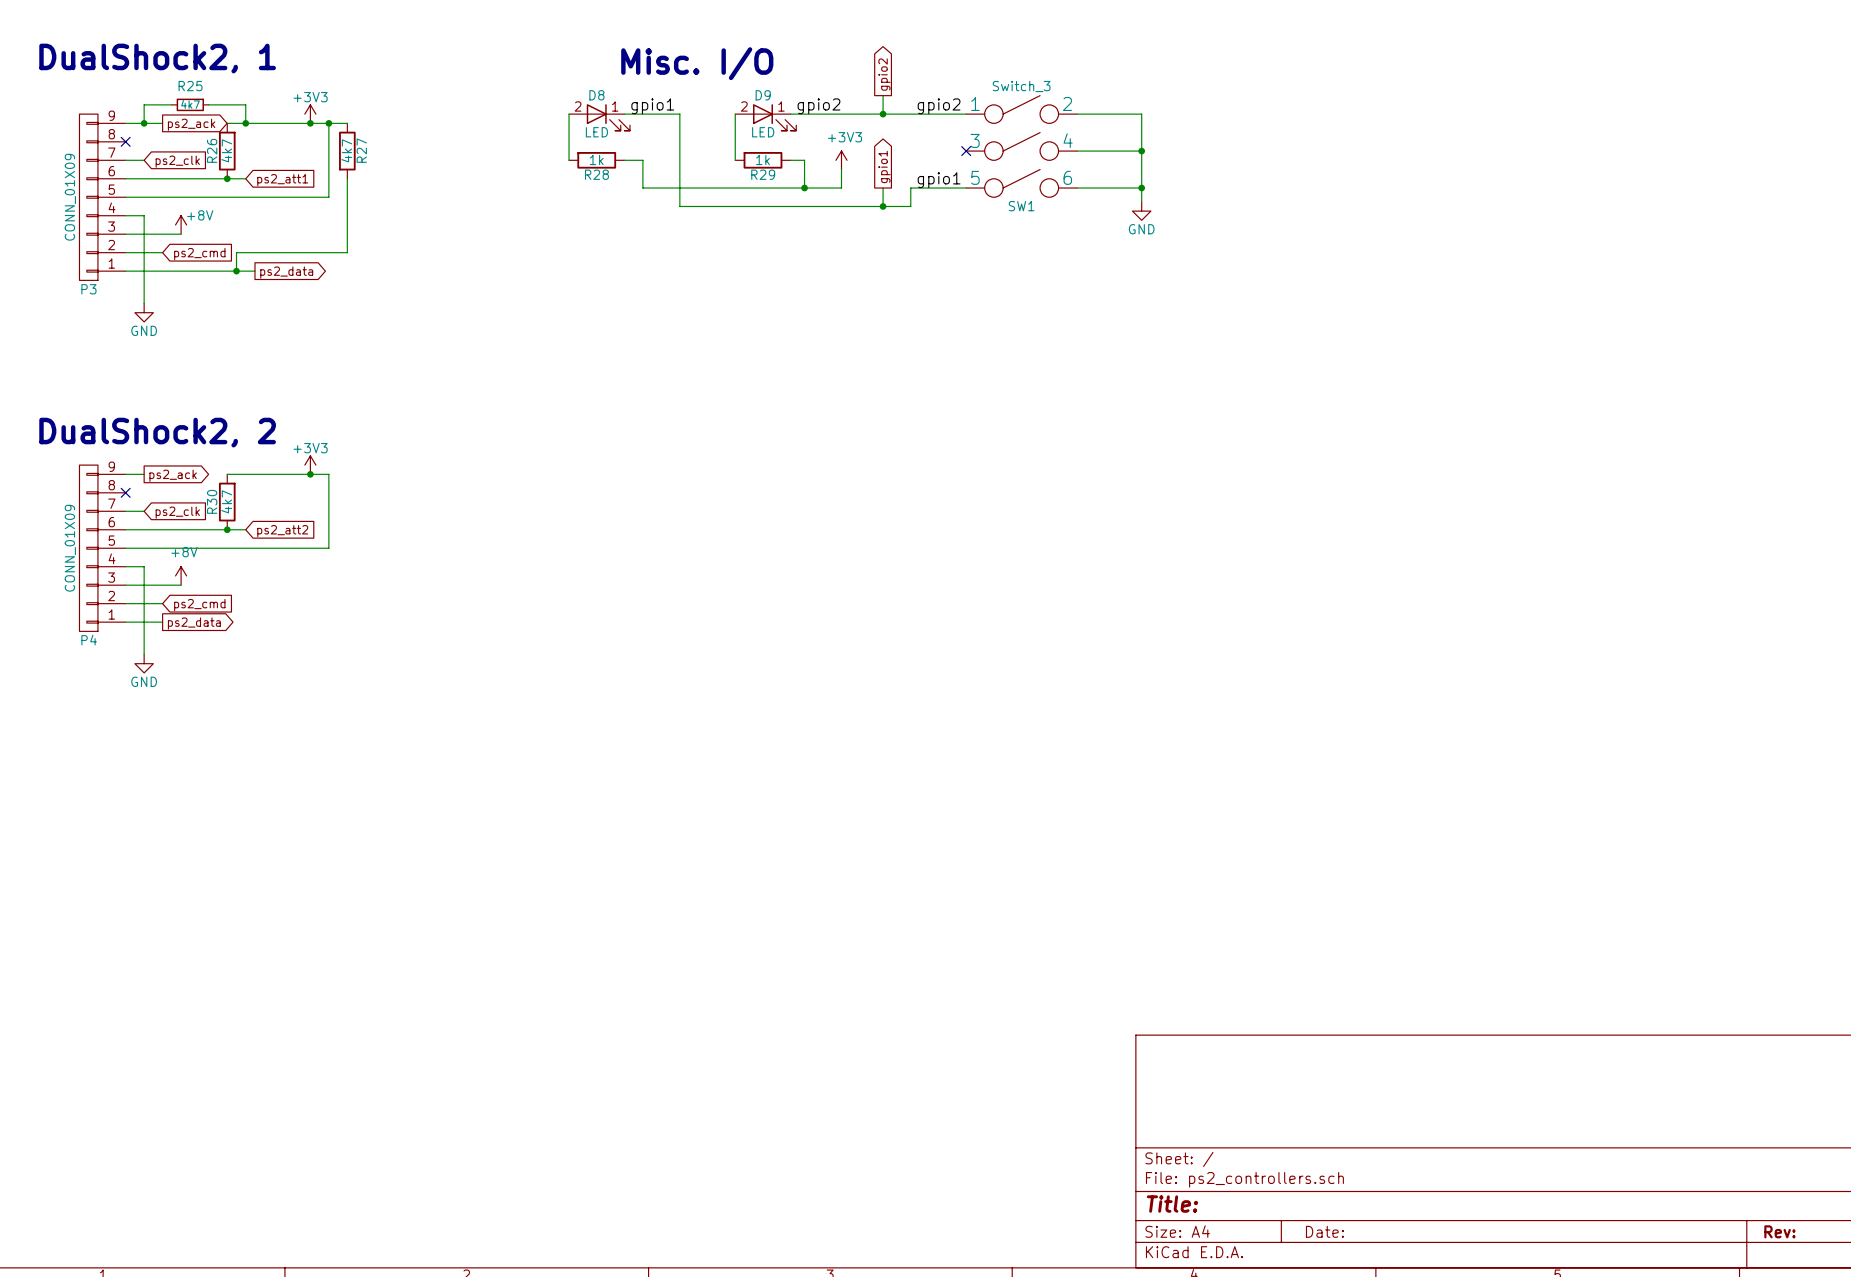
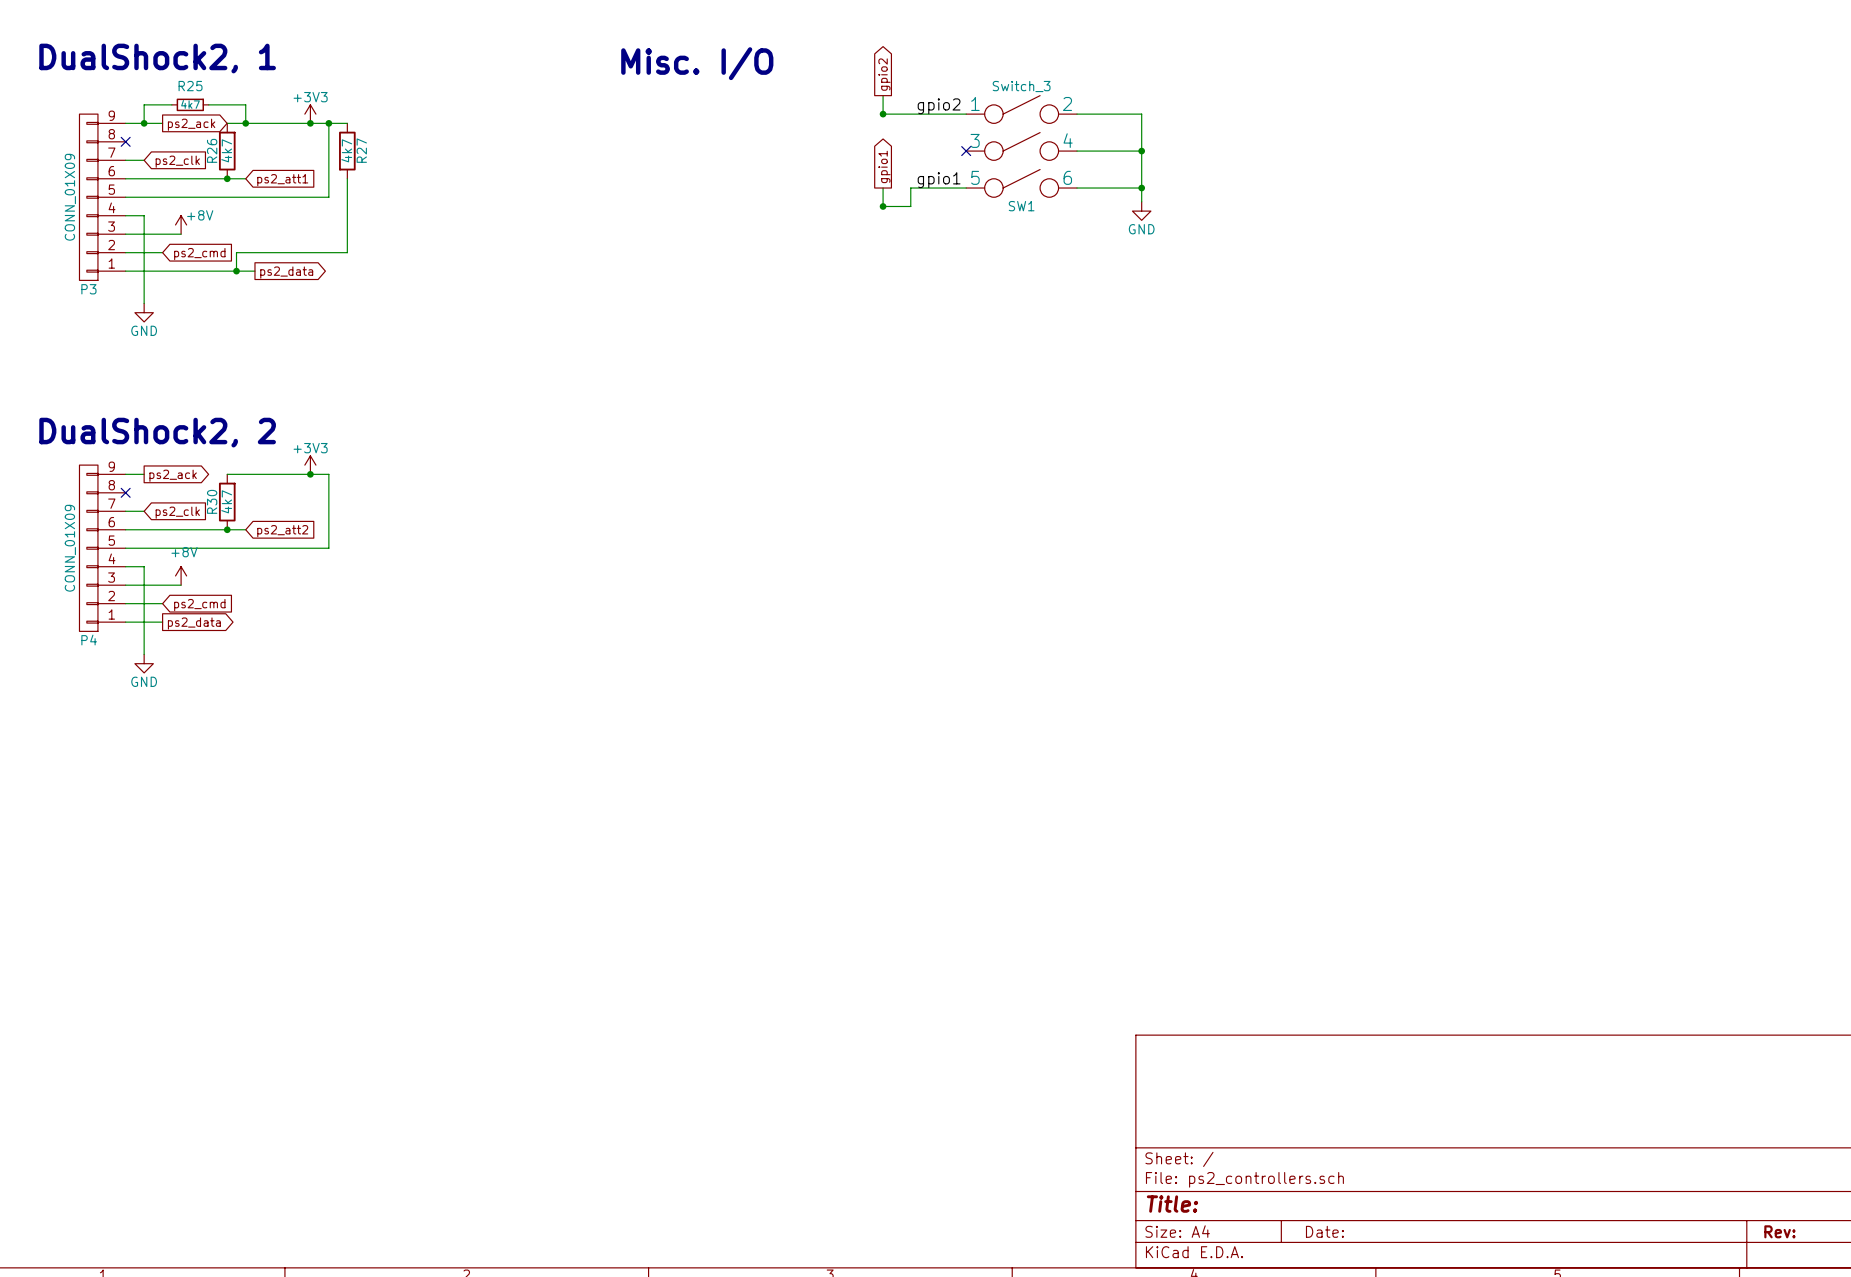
label: gpio1 (652, 106) -> none
label: gpio2 (819, 106) -> none
wire: (569, 114) (569, 160) -> none
wire: (624, 114) (679, 114) (679, 206) (883, 206) -> none
wire: (735, 114) (735, 160) -> none
wire: (790, 114) (883, 114) -> none
D8: LED (599, 117) -> none
D9: LED (765, 117) -> none
R28: 1k (596, 160) -> none
wire: (624, 160) (642, 160) (642, 188) (841, 188) (841, 169) -> none
R29: 1k (762, 160) -> none
wire: (790, 160) (804, 160) (804, 188) -> none
power symbol: +3V3 (841, 160) -> none
junction: (804, 188) -> none

